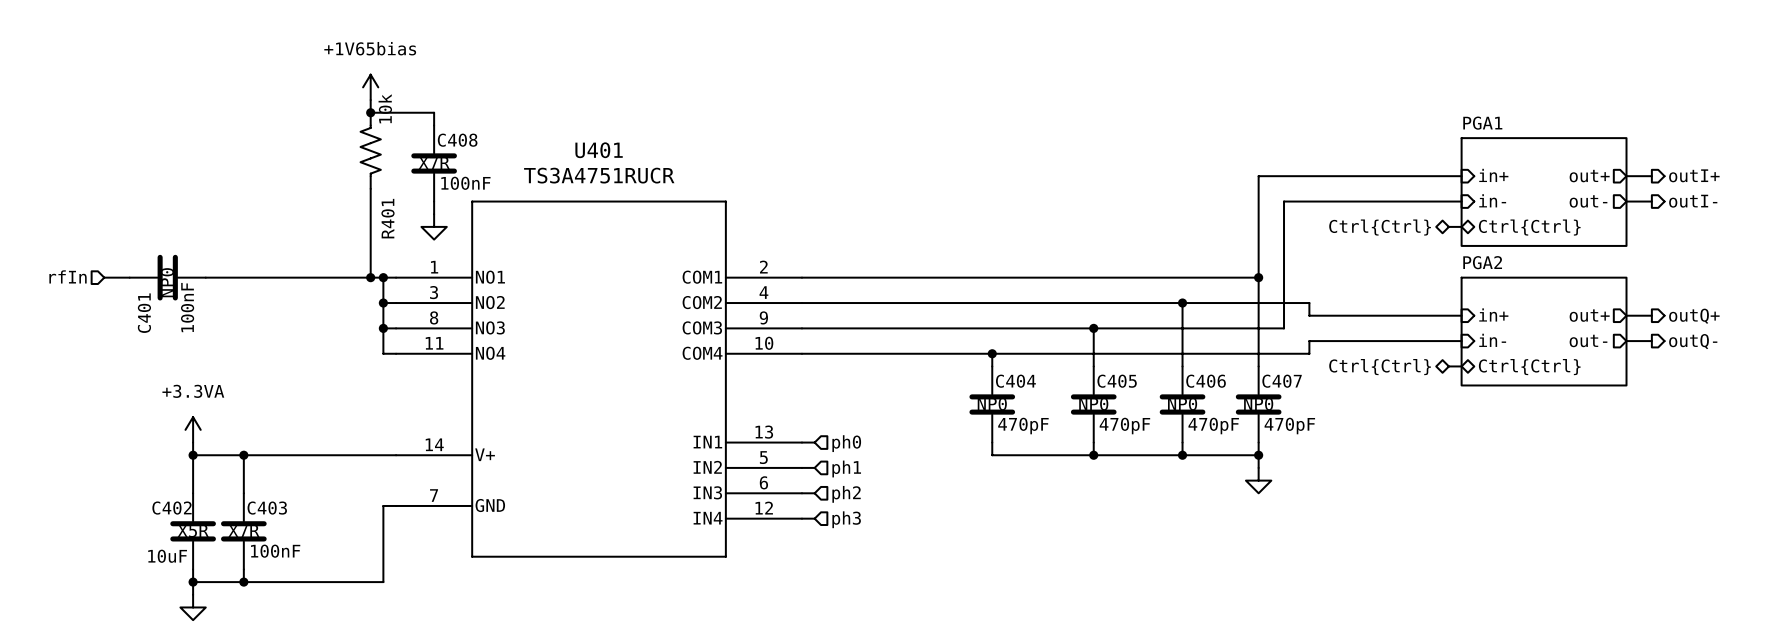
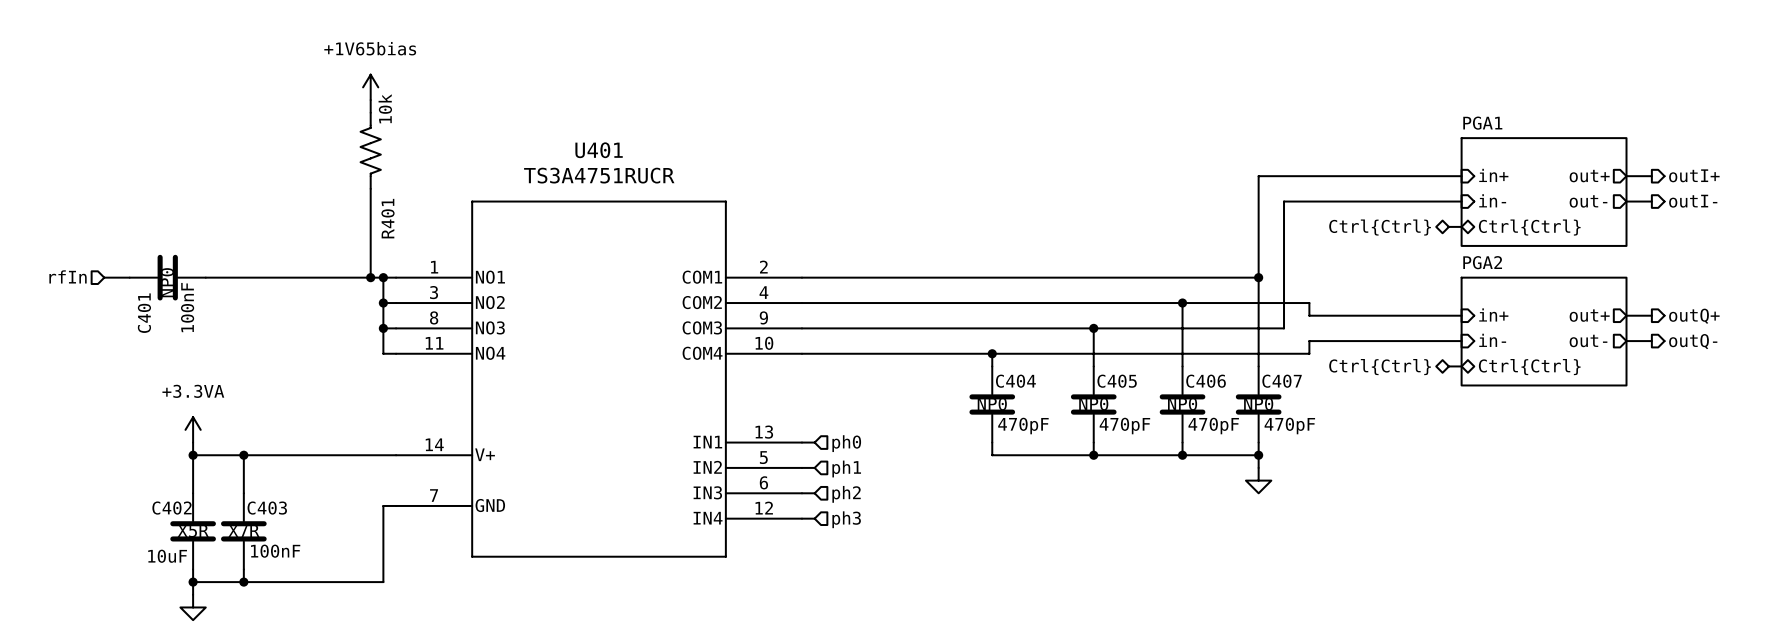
wire: (370, 112) (434, 112) (434, 125) -> none
junction: (370, 112) -> none
C408: 100nF (434, 163) -> none
wire: (434, 201) (434, 214) -> none
power symbol: (434, 226) -> none

